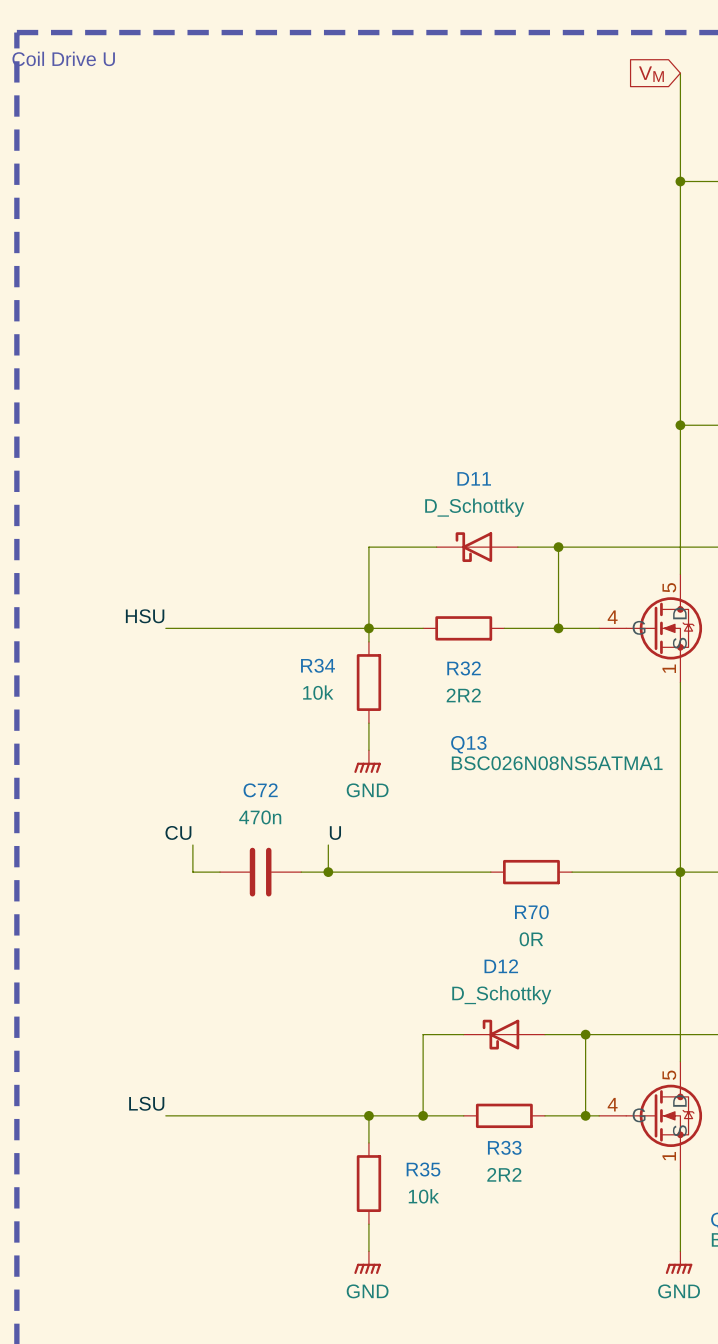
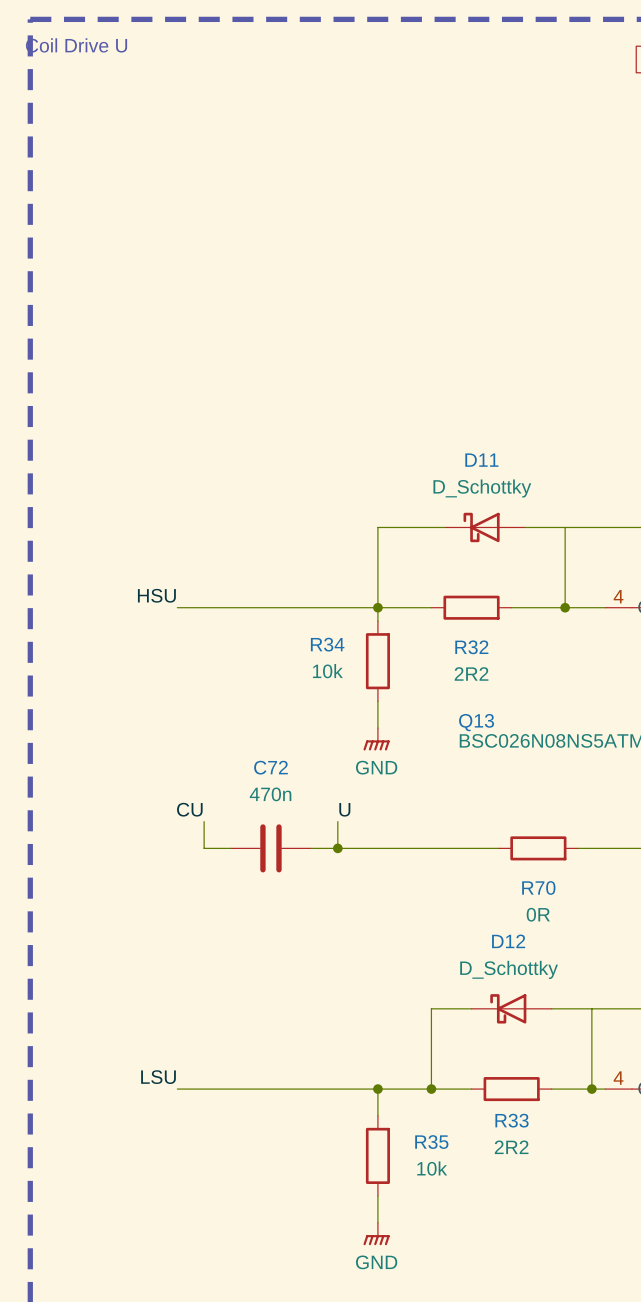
junction: (558, 547) -> none
junction: (585, 1034) -> none

